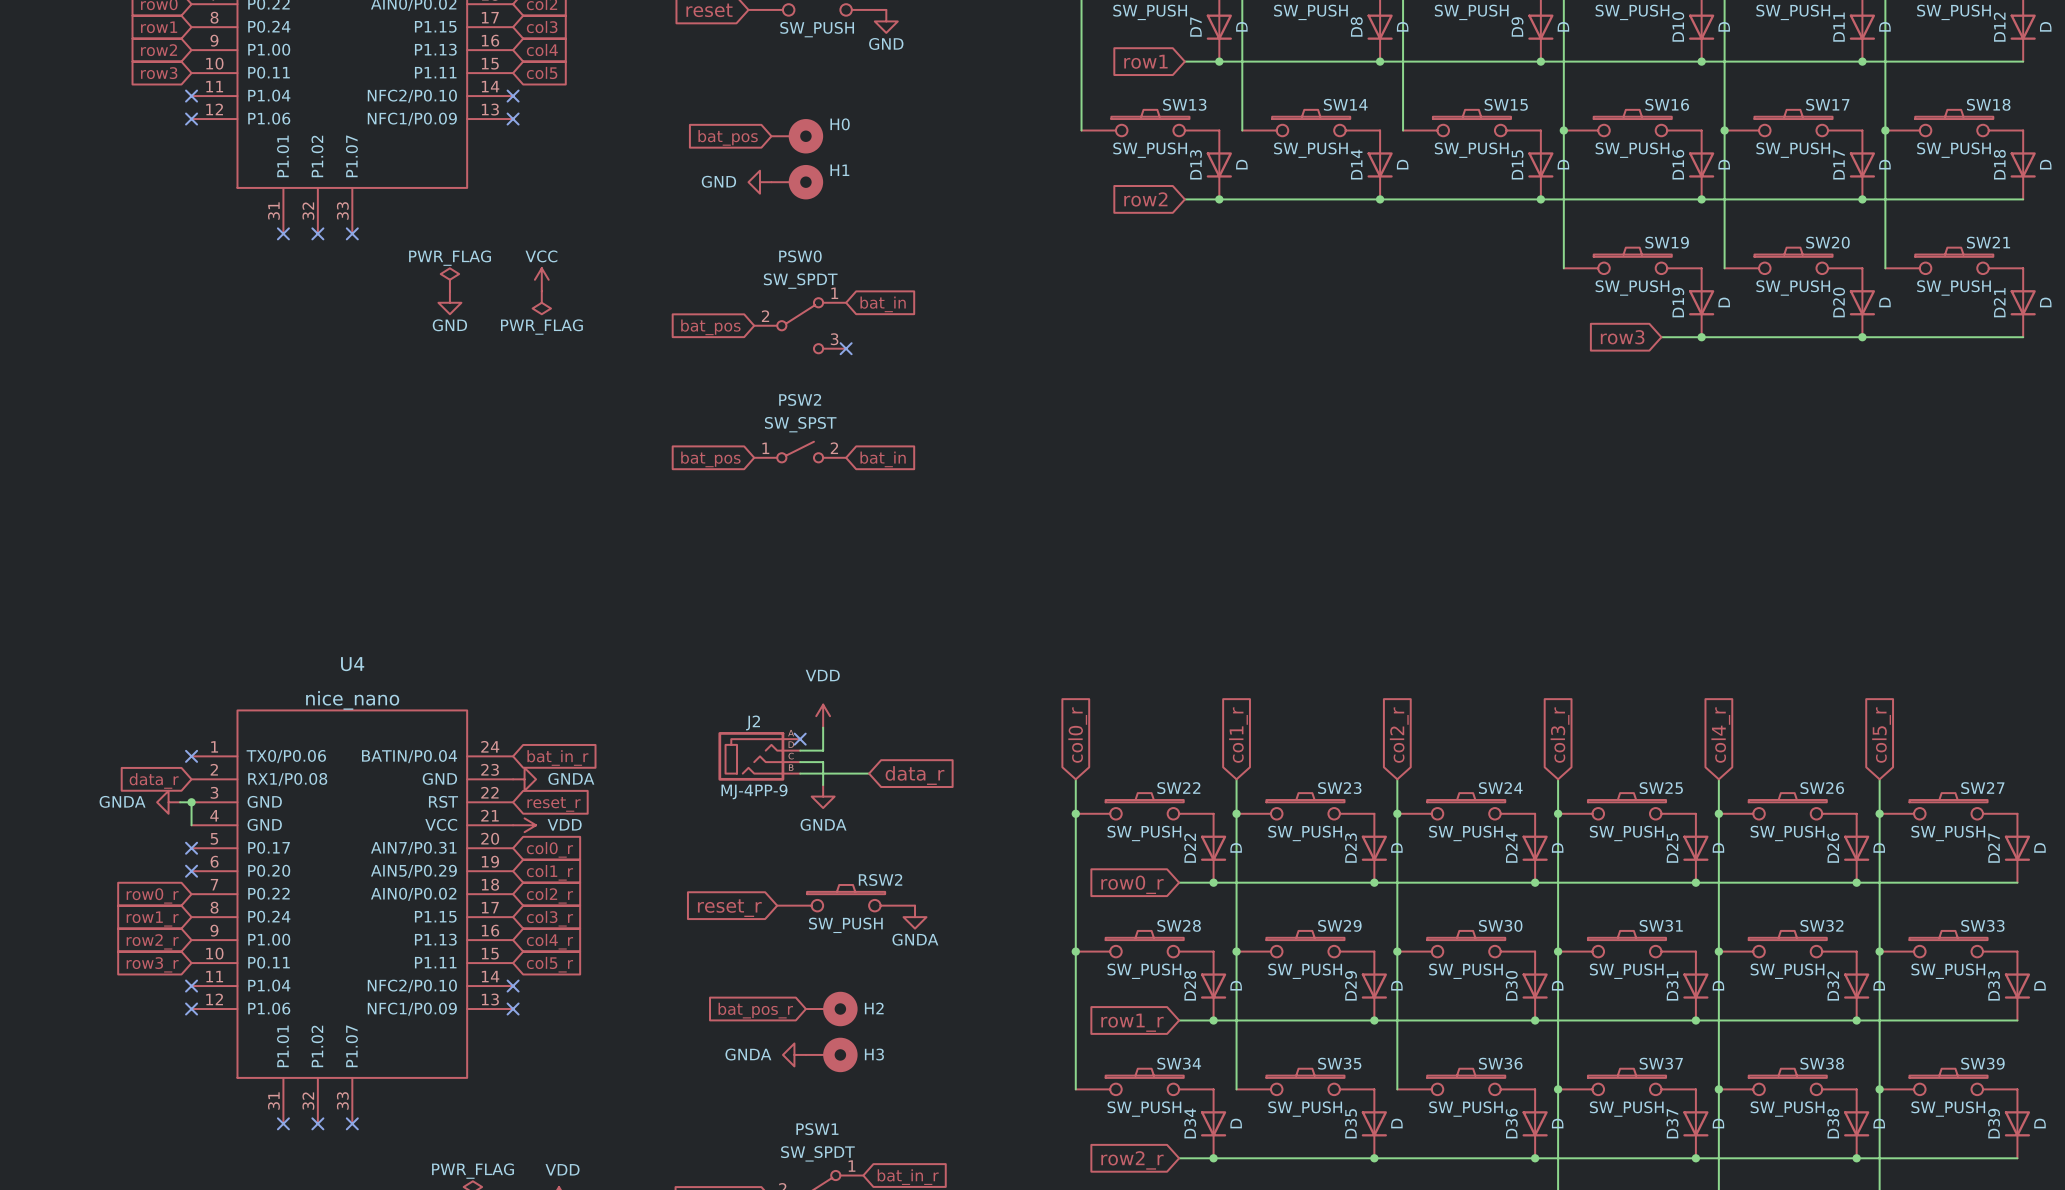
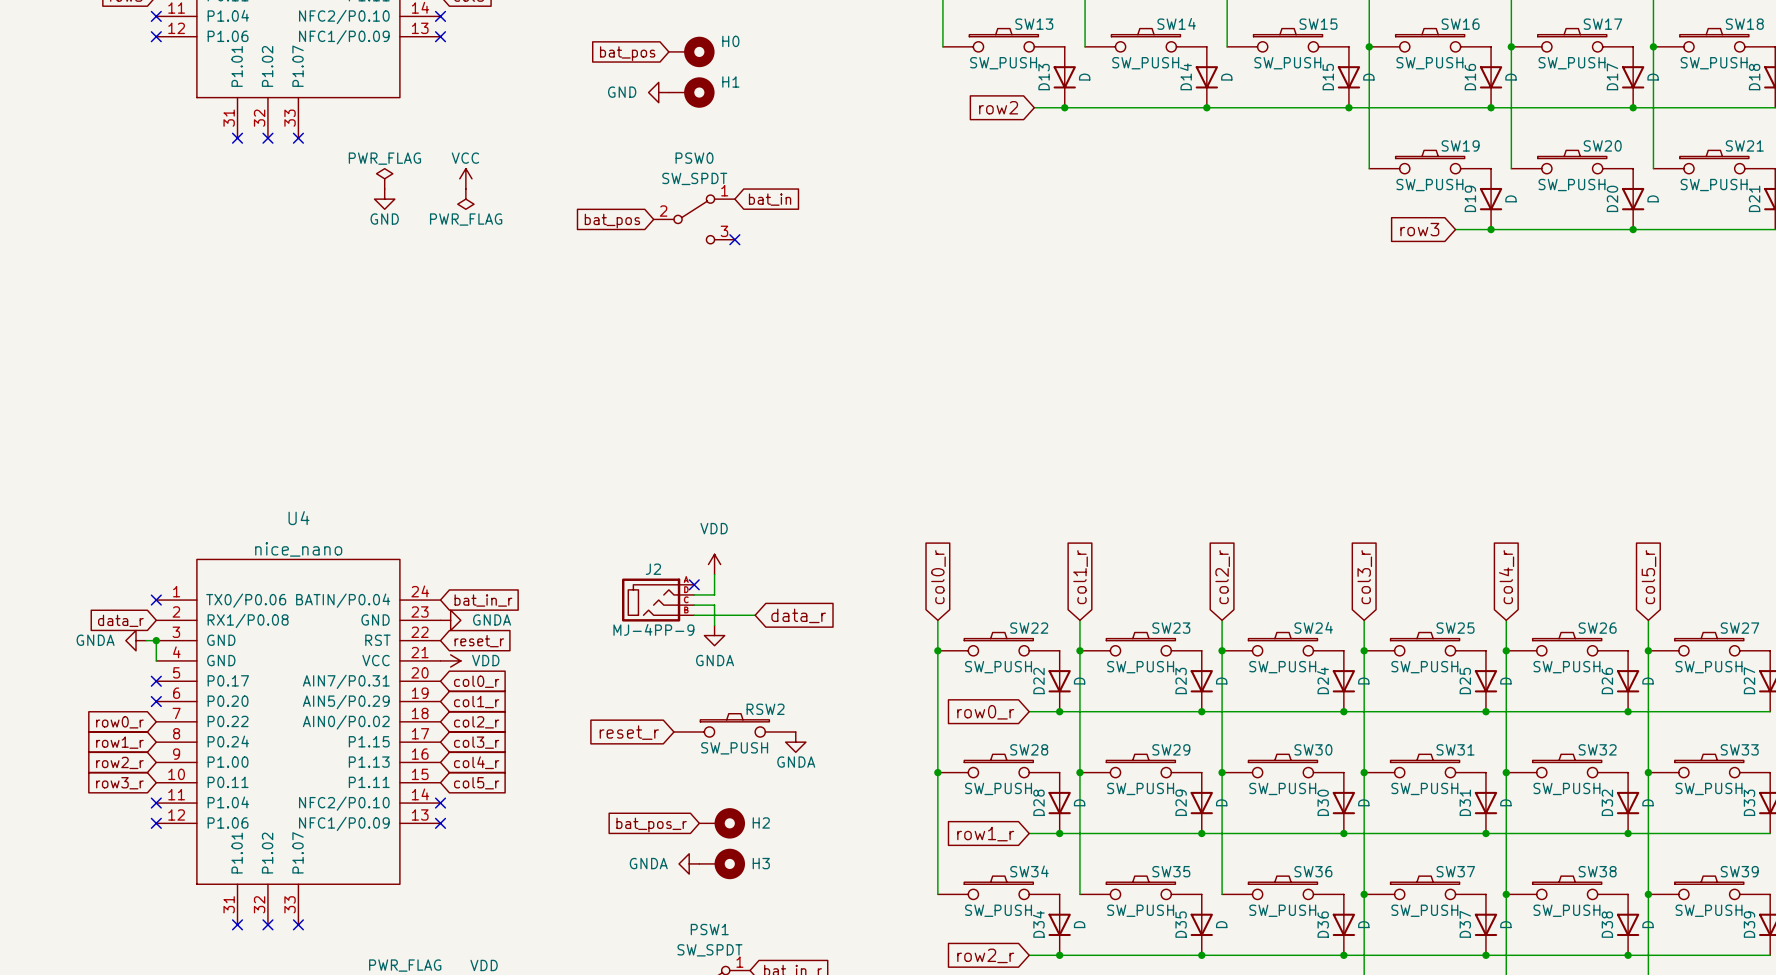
PSW2: SW_SPST (800, 452) -> none
global label: bat_pos (710, 459) -> none
global label: bat_in (883, 459) -> none

